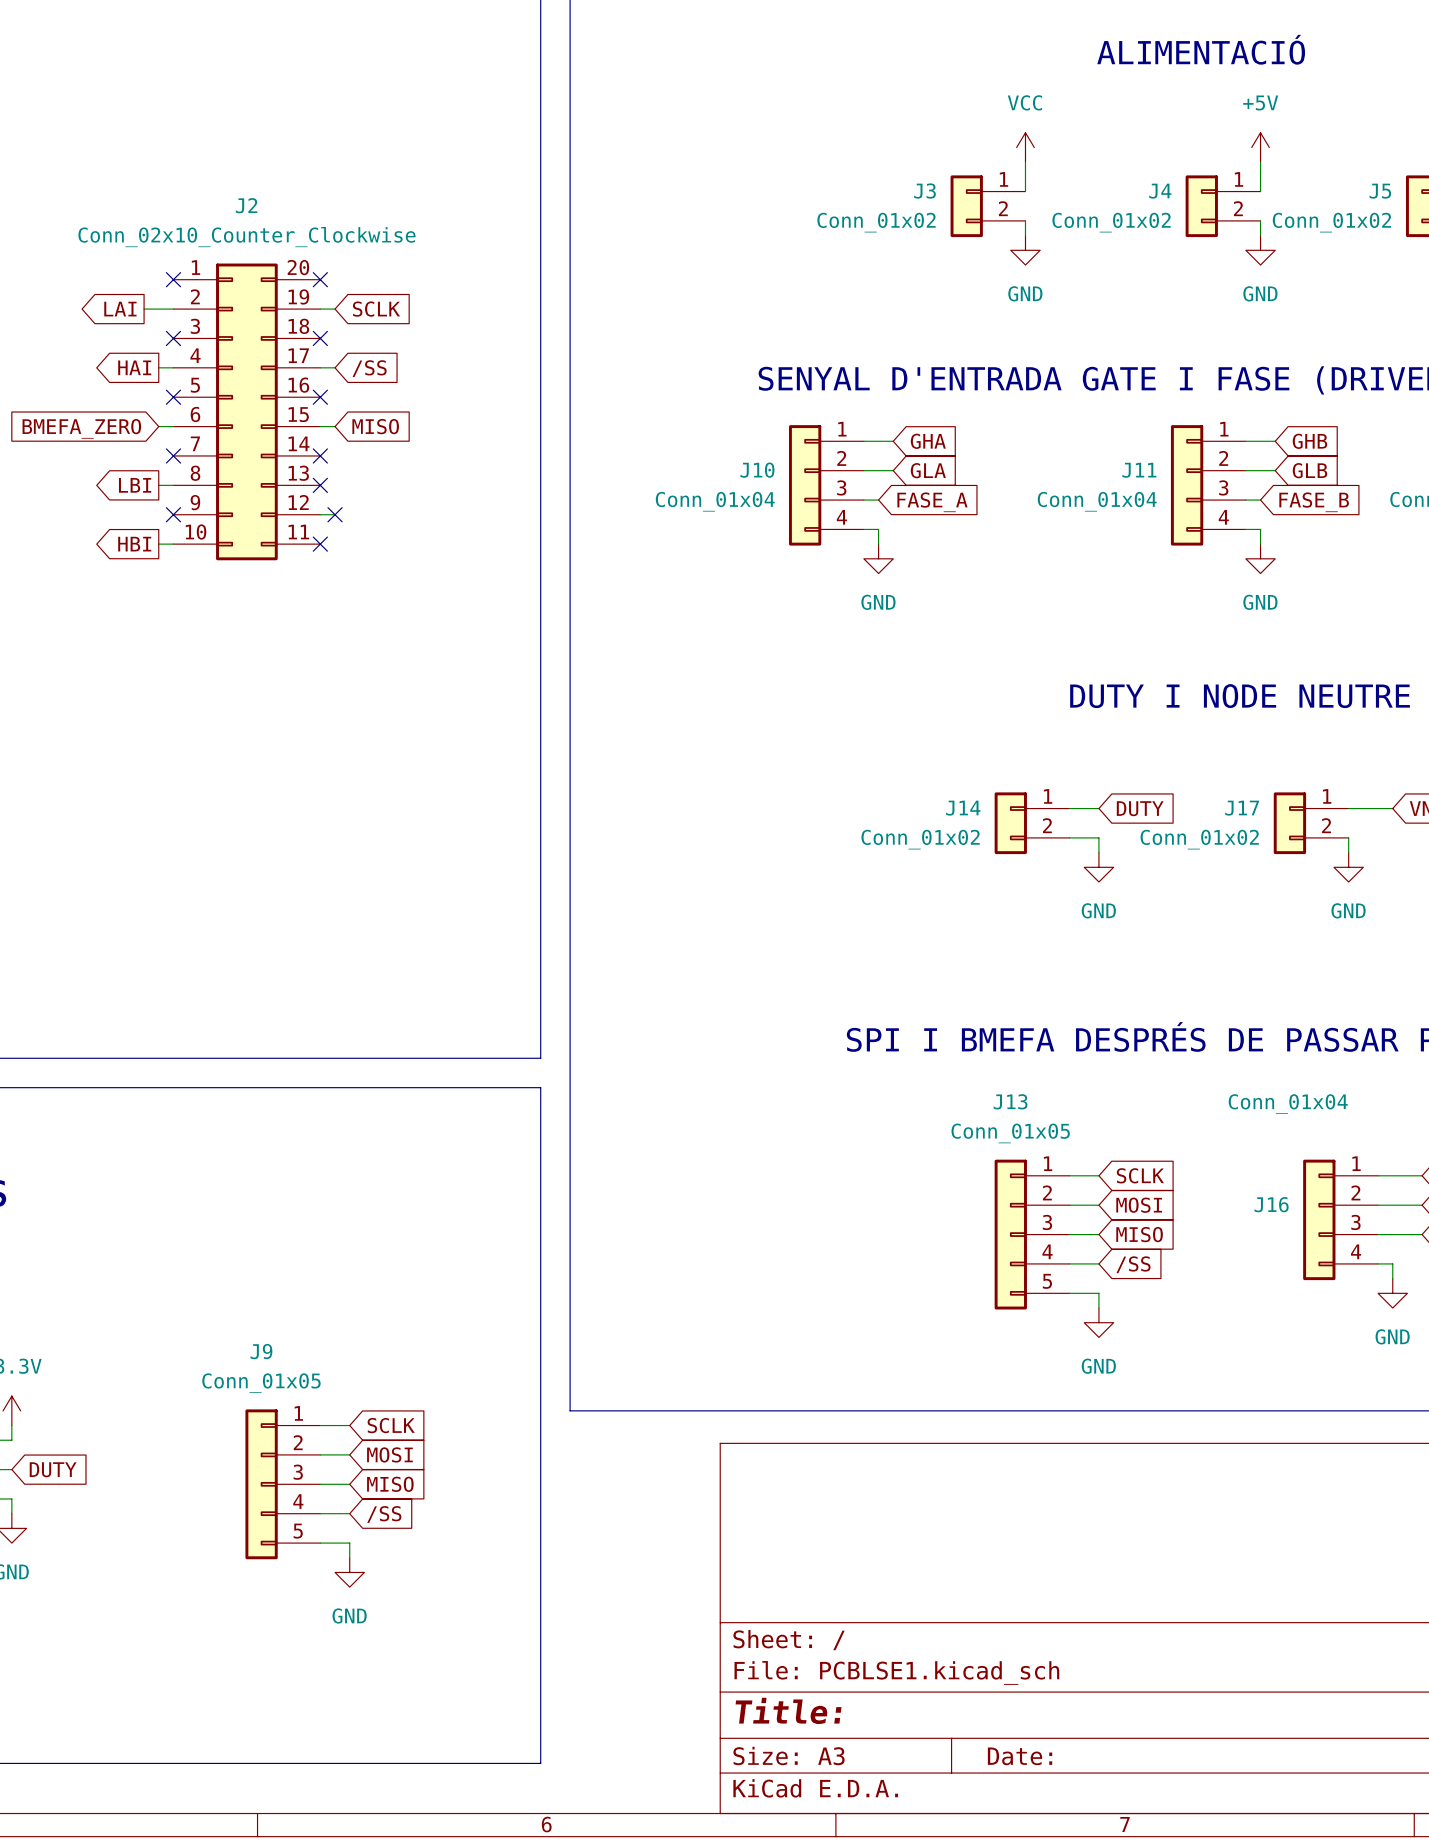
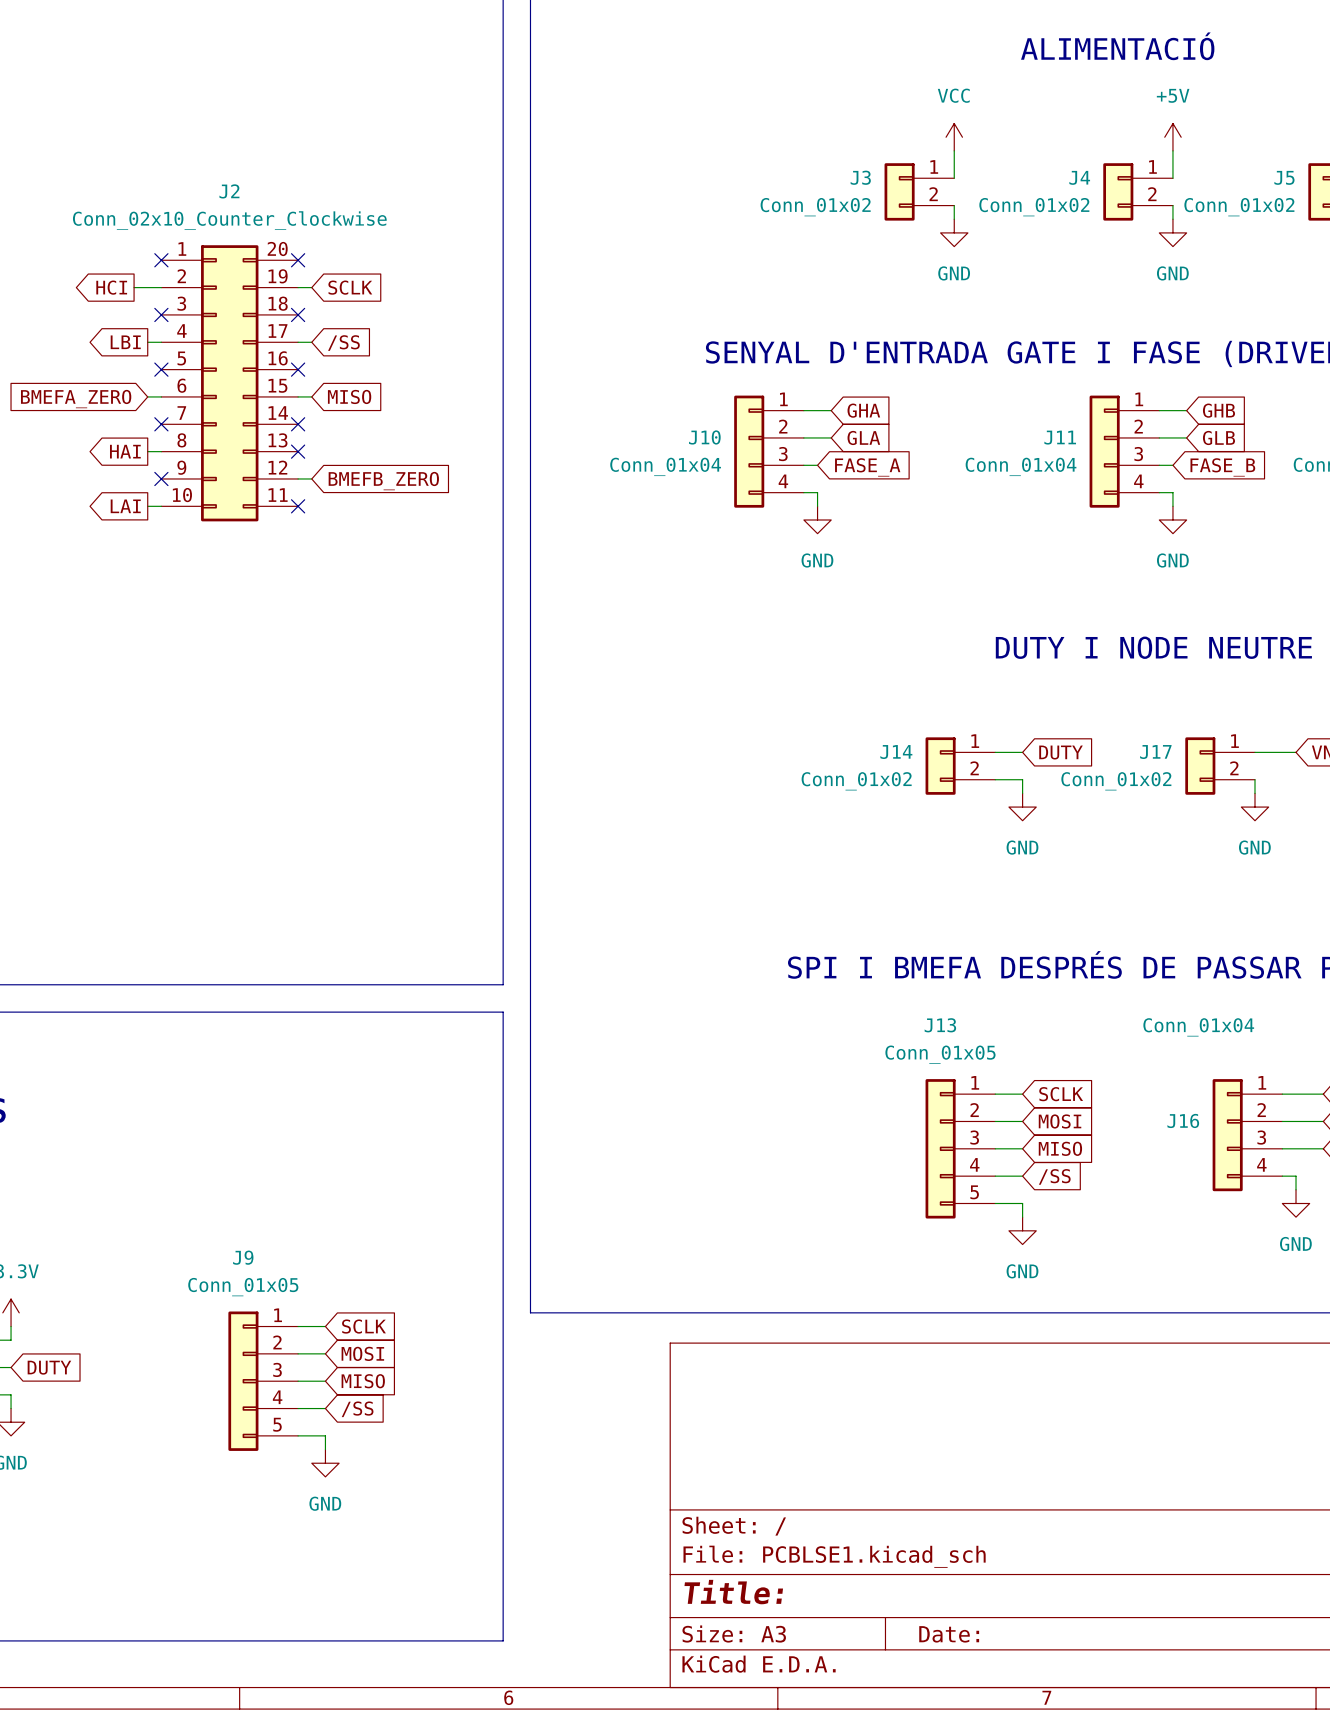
global label: LAI (120, 309) -> HCI (111, 287)
global label: HAI (134, 367) -> LBI (125, 342)
global label: LBI (135, 485) -> HAI (125, 451)
no-connect mark: (335, 514) -> none
global label: none -> BMEFB_ZERO (383, 481)
global label: HBI (134, 544) -> LAI (125, 506)

